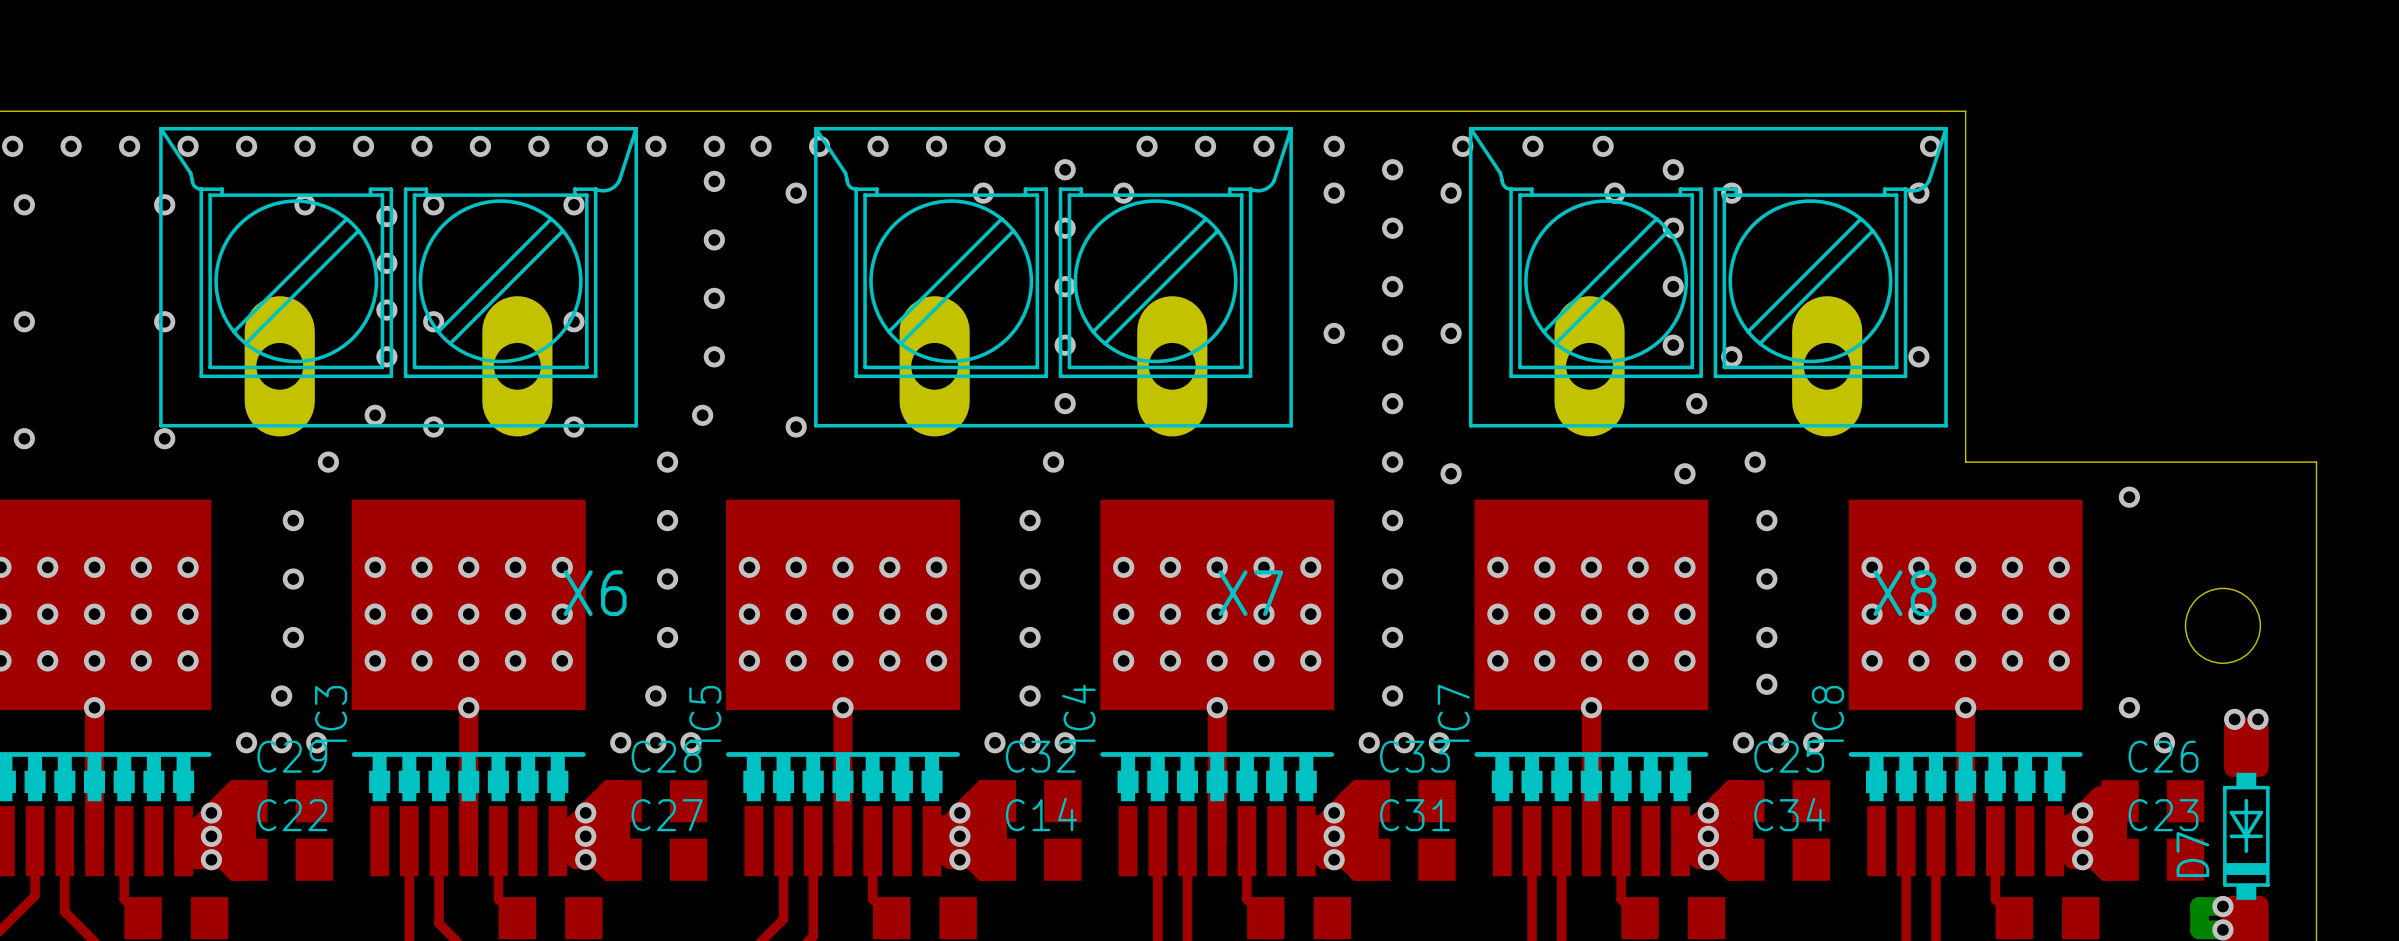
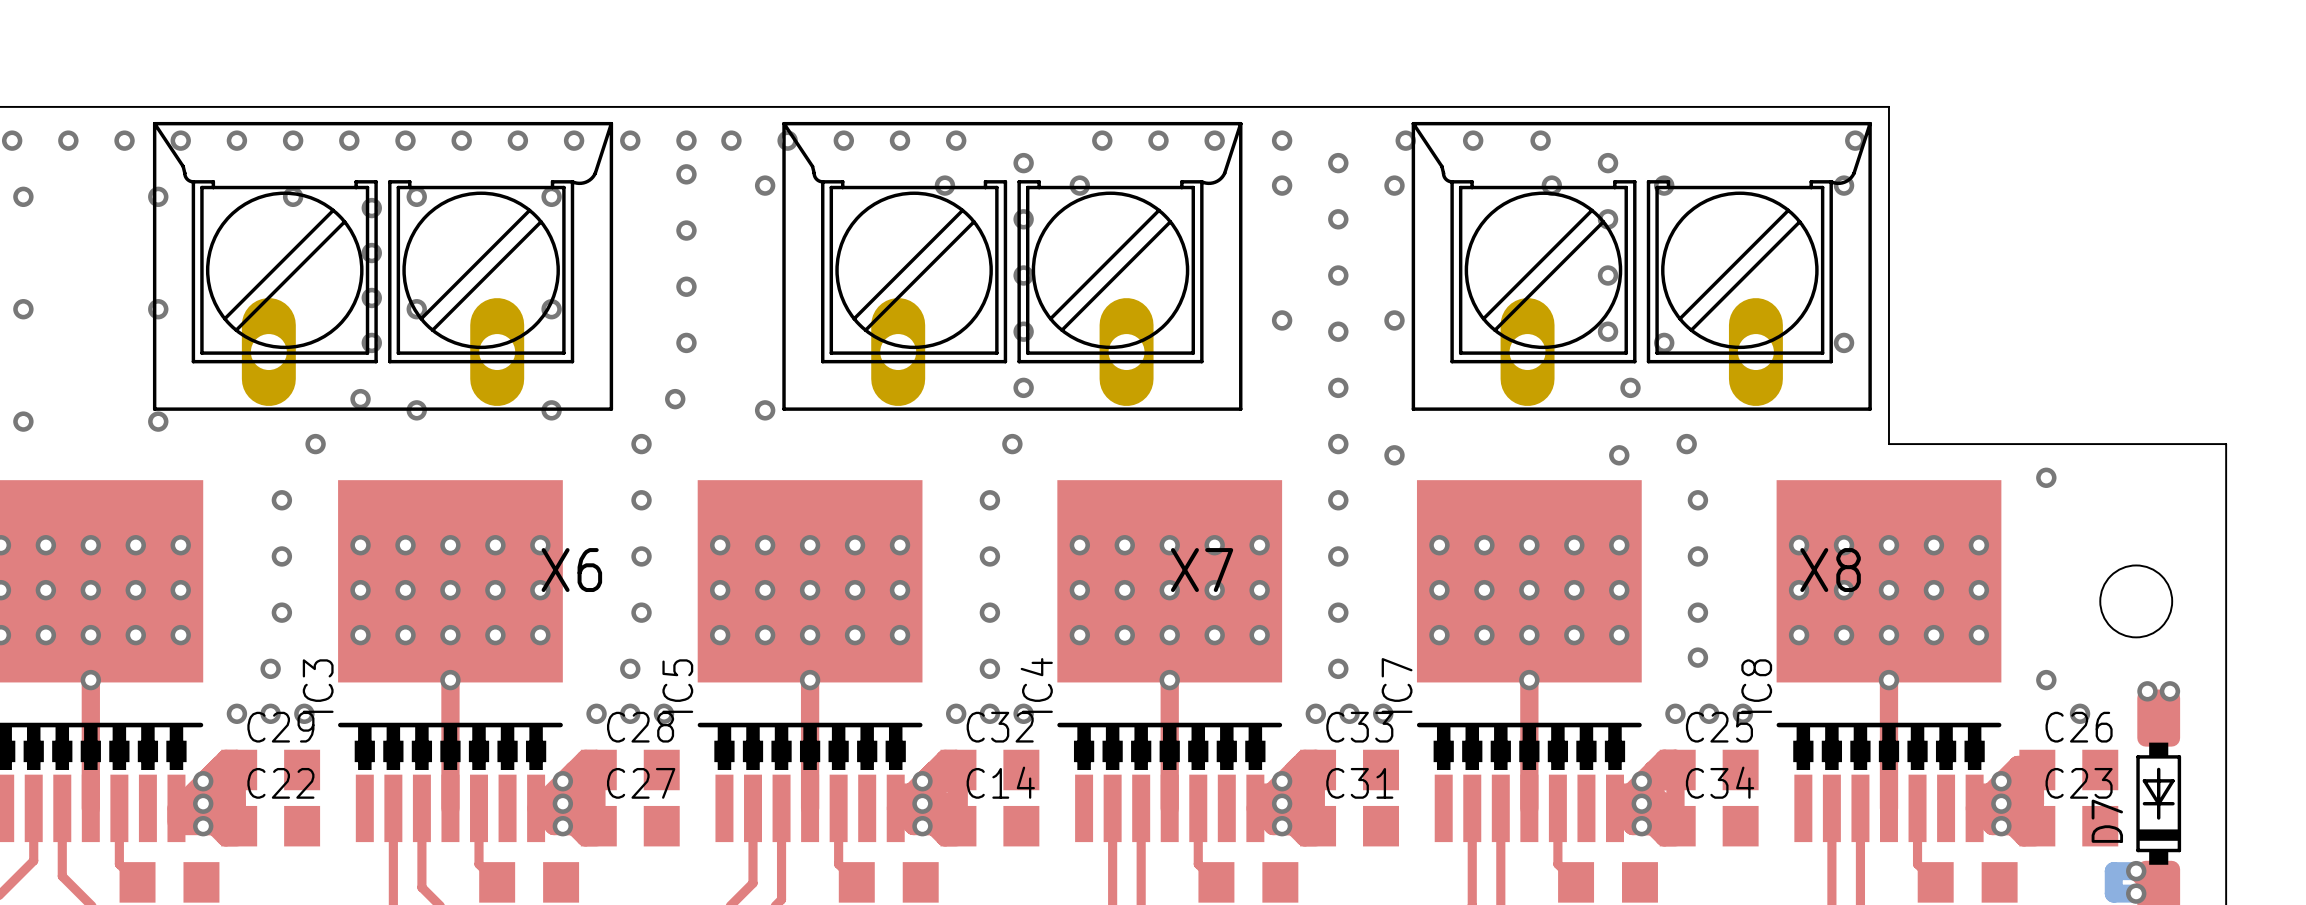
X6 footprint: [159, 126, 638, 437] -> [152, 121, 614, 411]
X7 footprint: [814, 126, 1293, 437] -> [782, 121, 1243, 411]
X8 footprint: [1468, 126, 1948, 437] -> [1411, 121, 1872, 411]

